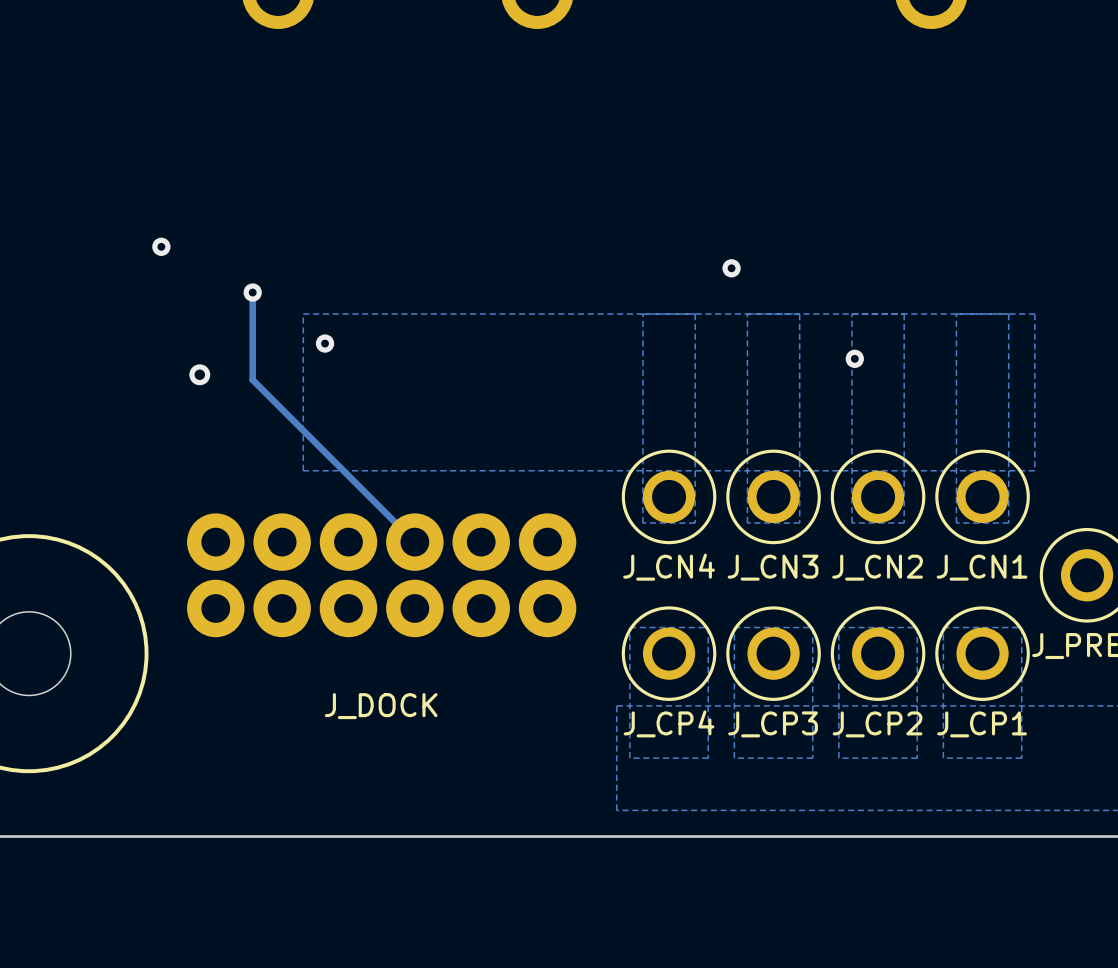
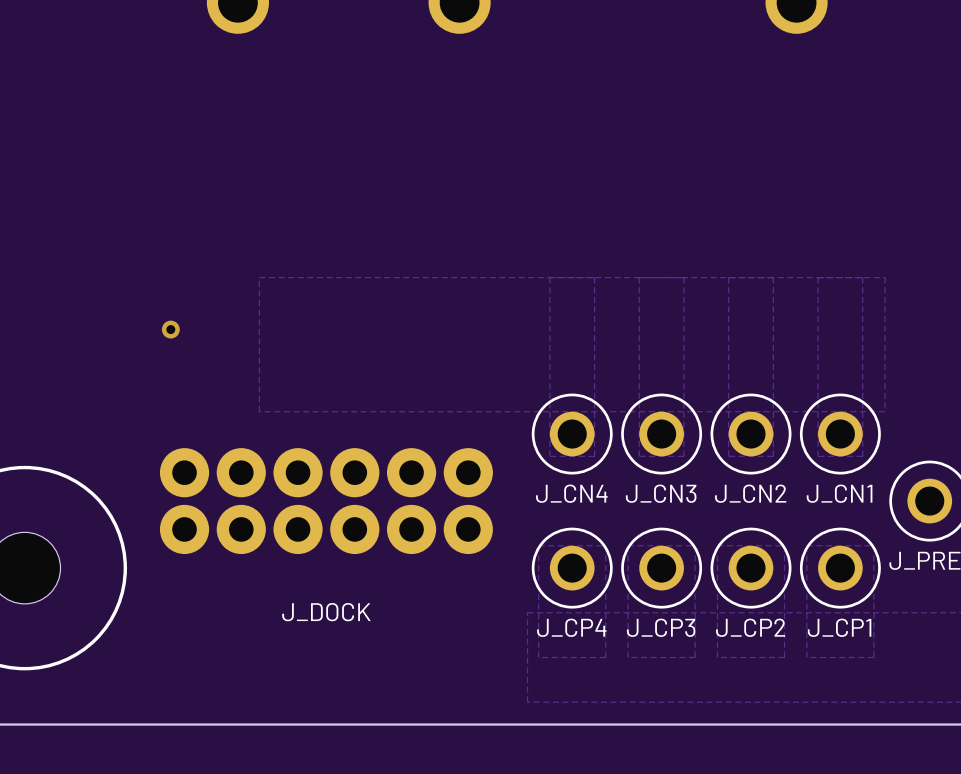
via: (161, 246) -> none
via: (731, 268) -> none
track: (252, 292) (252, 379) (414, 542) -> none
via: (252, 292) -> none
via: (325, 343) -> none
via: (854, 358) -> none

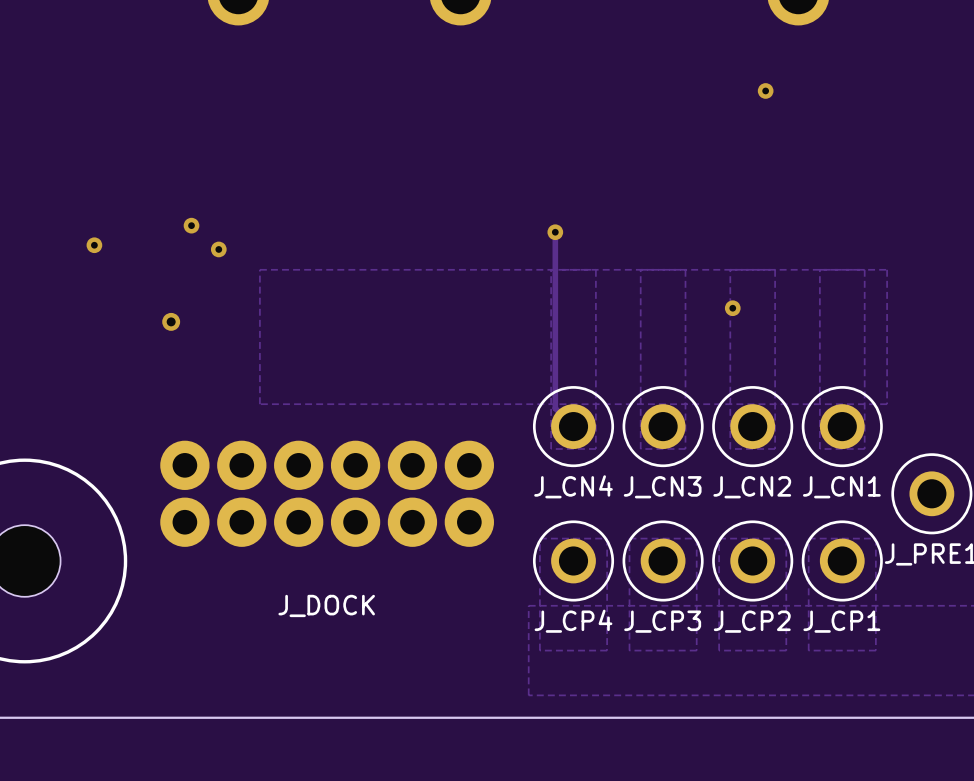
via: none -> (765, 90)
via: none -> (191, 225)
track: none -> (555, 232) (555, 408) (573, 426)
via: none -> (555, 232)
via: none -> (94, 245)
via: none -> (218, 249)
via: none -> (732, 308)

